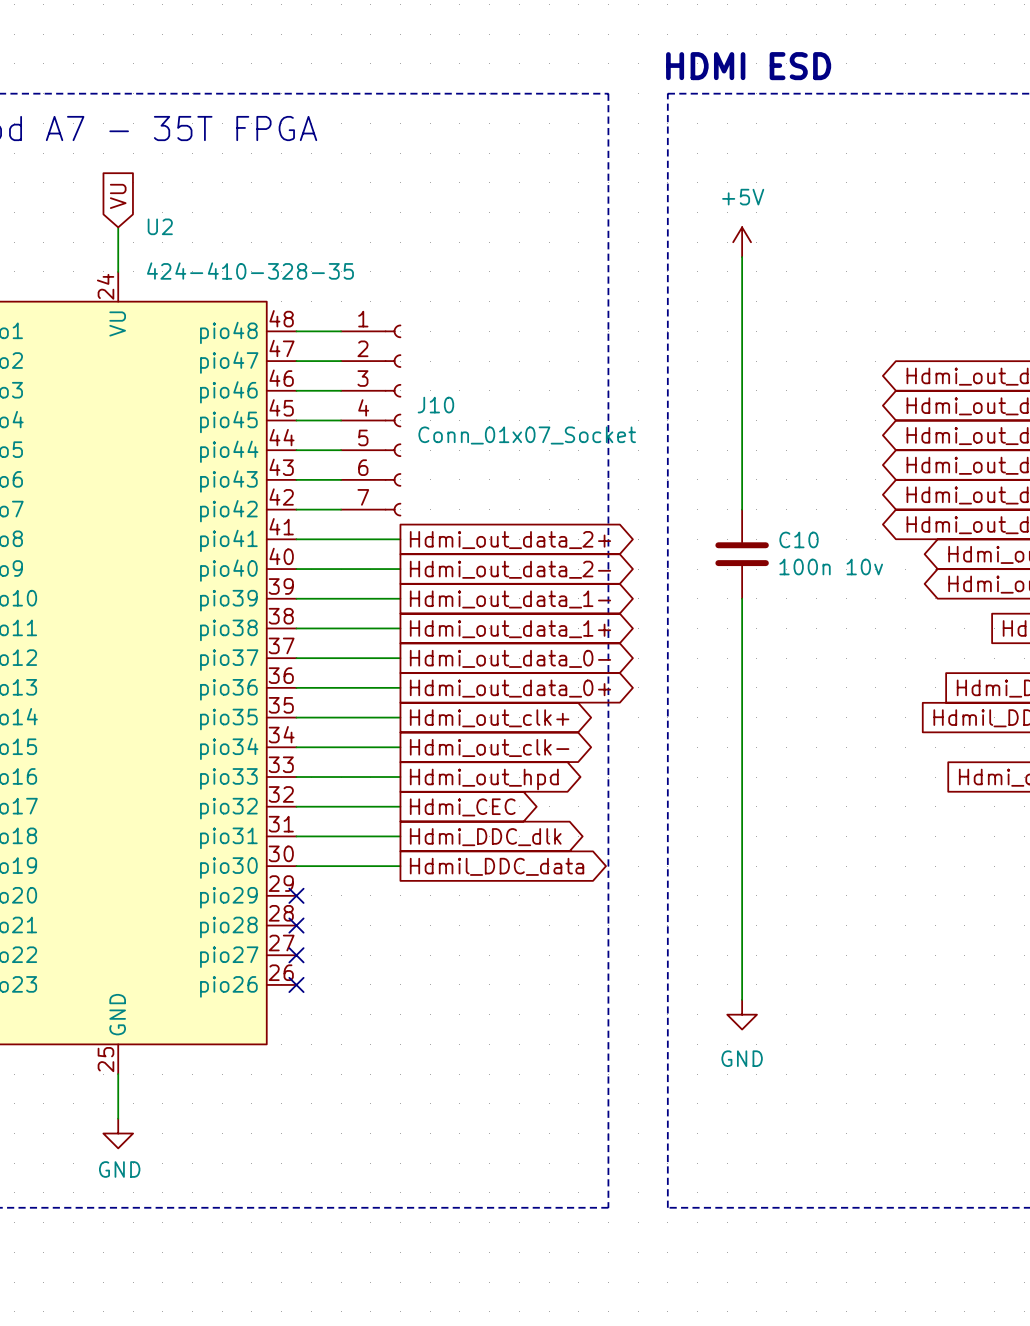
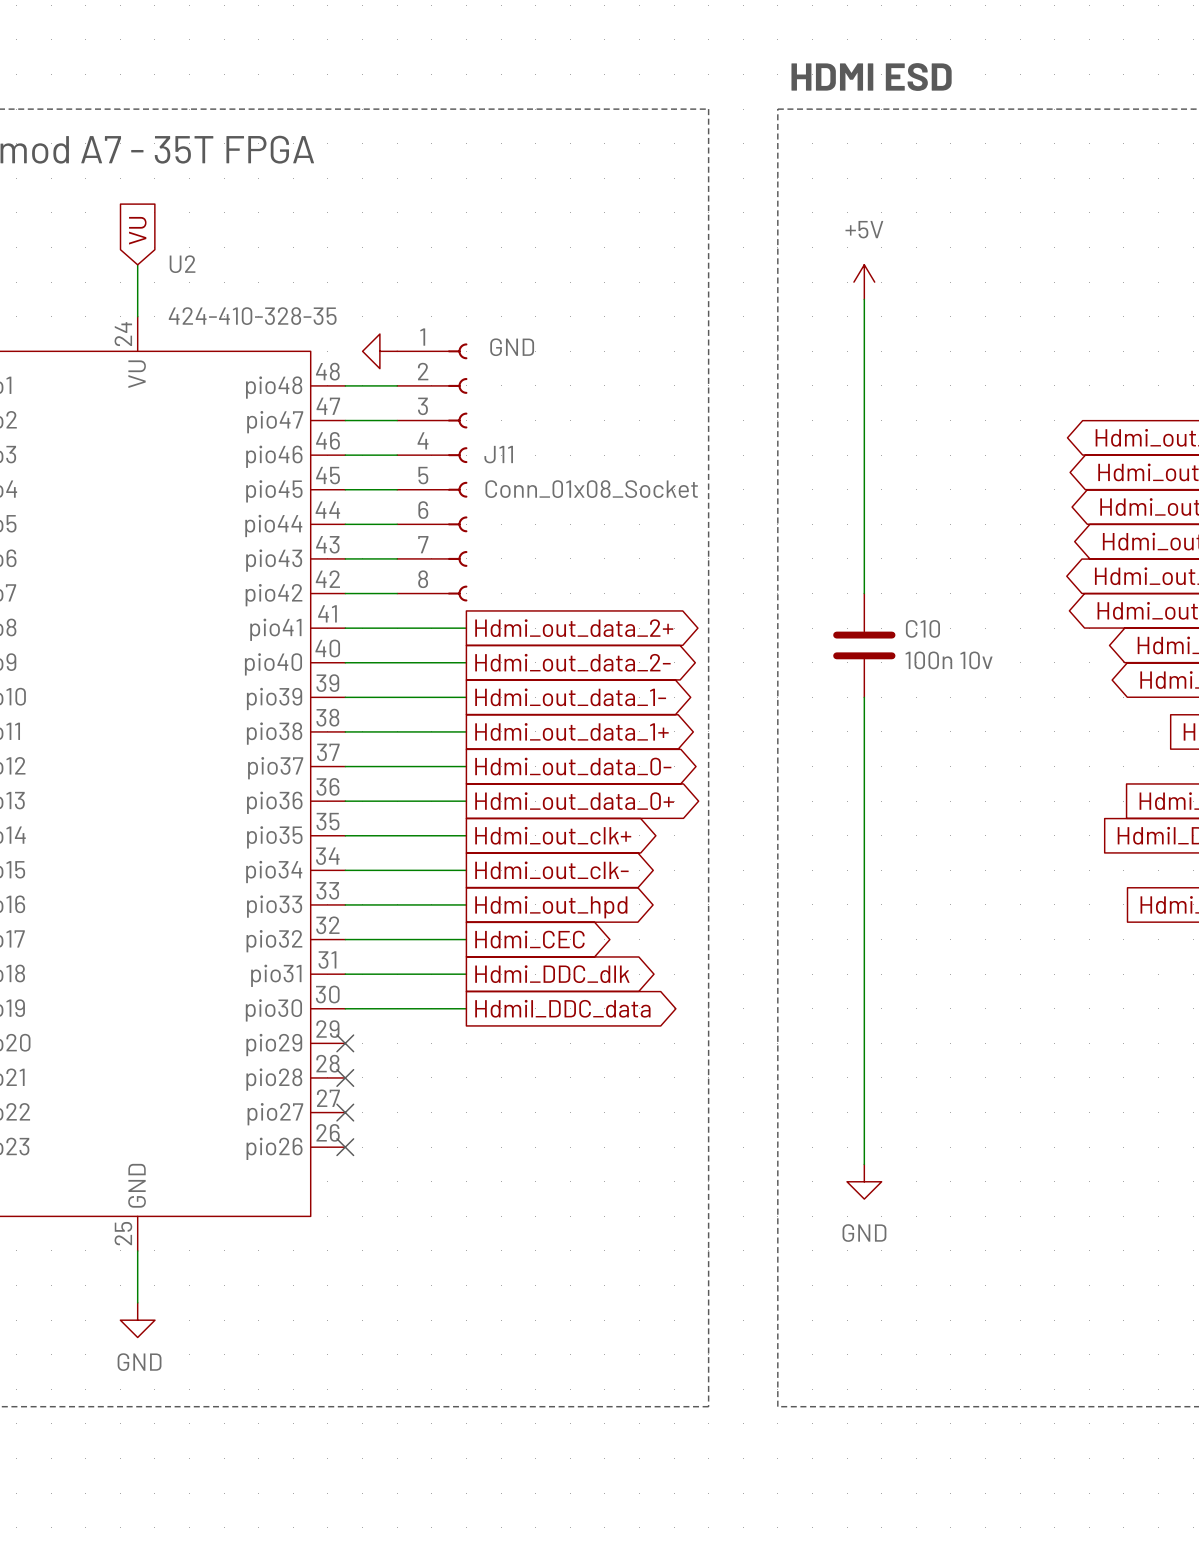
power symbol: none -> GND (379, 351)
J11: none -> Conn_01x08_Socket (432, 472)
J10: Conn_01x07_Socket (371, 420) -> none

